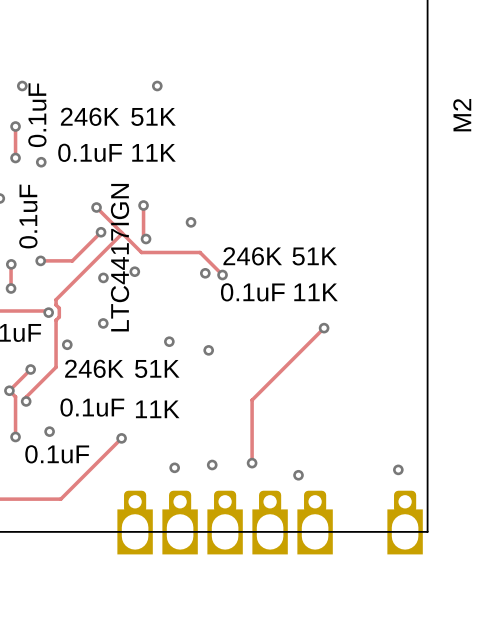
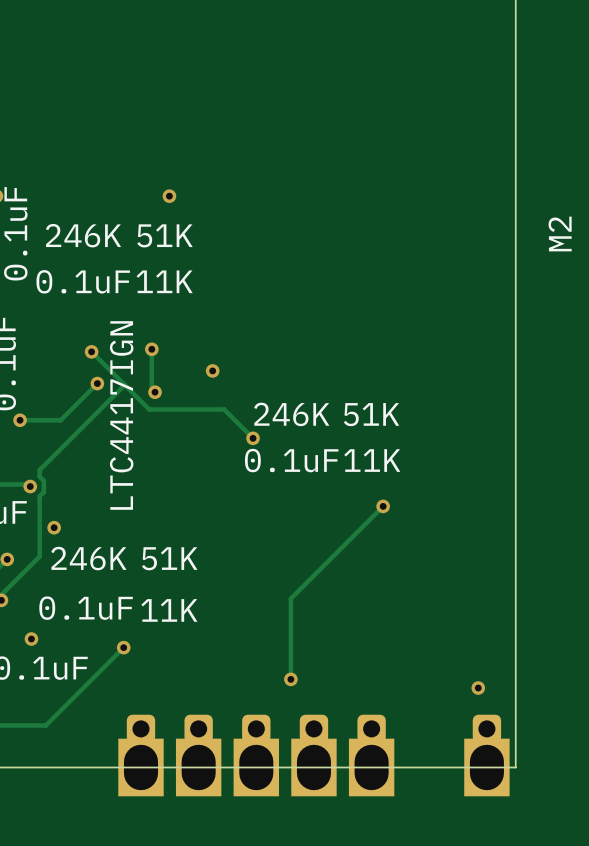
via: (41, 162) -> none
via: (134, 271) -> none
via: (205, 273) -> none
via: (103, 277) -> none
via: (103, 323) -> none
via: (169, 341) -> none
via: (208, 350) -> none
via: (212, 464) -> none
via: (174, 467) -> none
via: (298, 475) -> none

